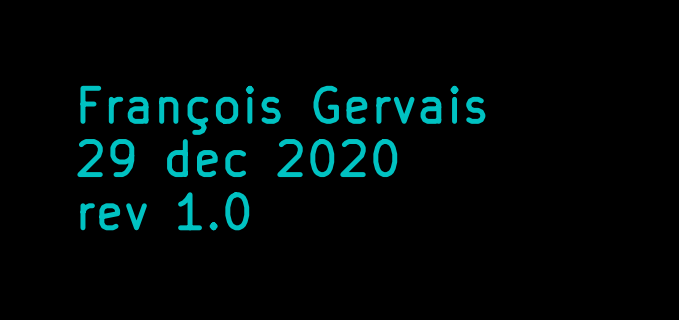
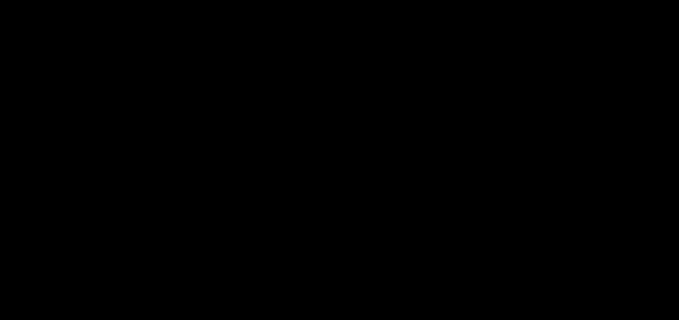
text: François Gervais (282, 110) -> none
text: 29 dec 2020 (237, 158) -> none
text: rev 1.0 (164, 211) -> none

